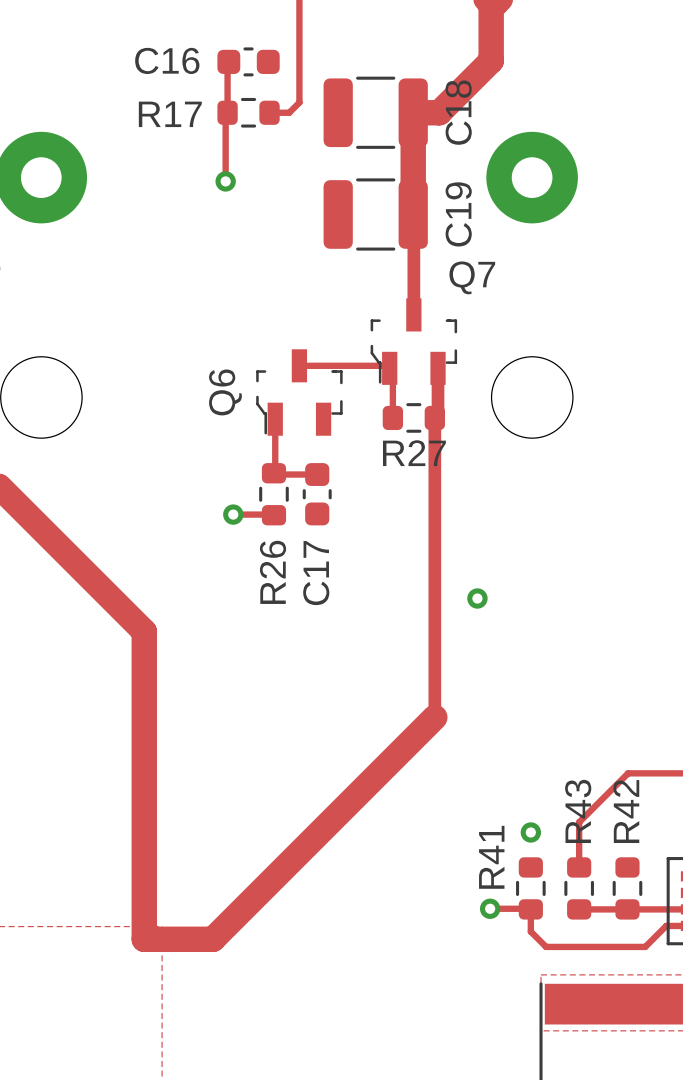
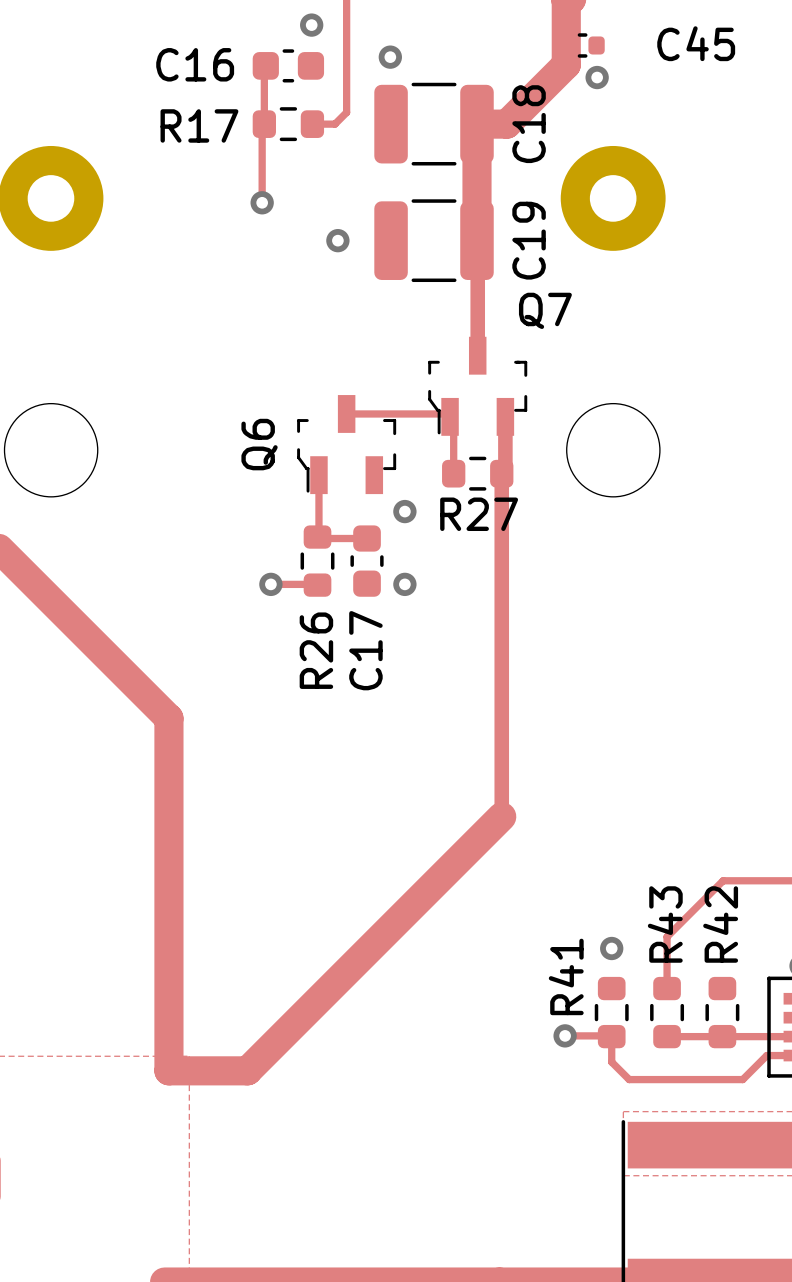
via: none -> (311, 25)
C45: none -> (582, 45)
via: none -> (390, 57)
via: none -> (597, 77)
via: none -> (337, 240)
via: none -> (404, 511)
via: none -> (404, 584)
via: (477, 598) -> none

